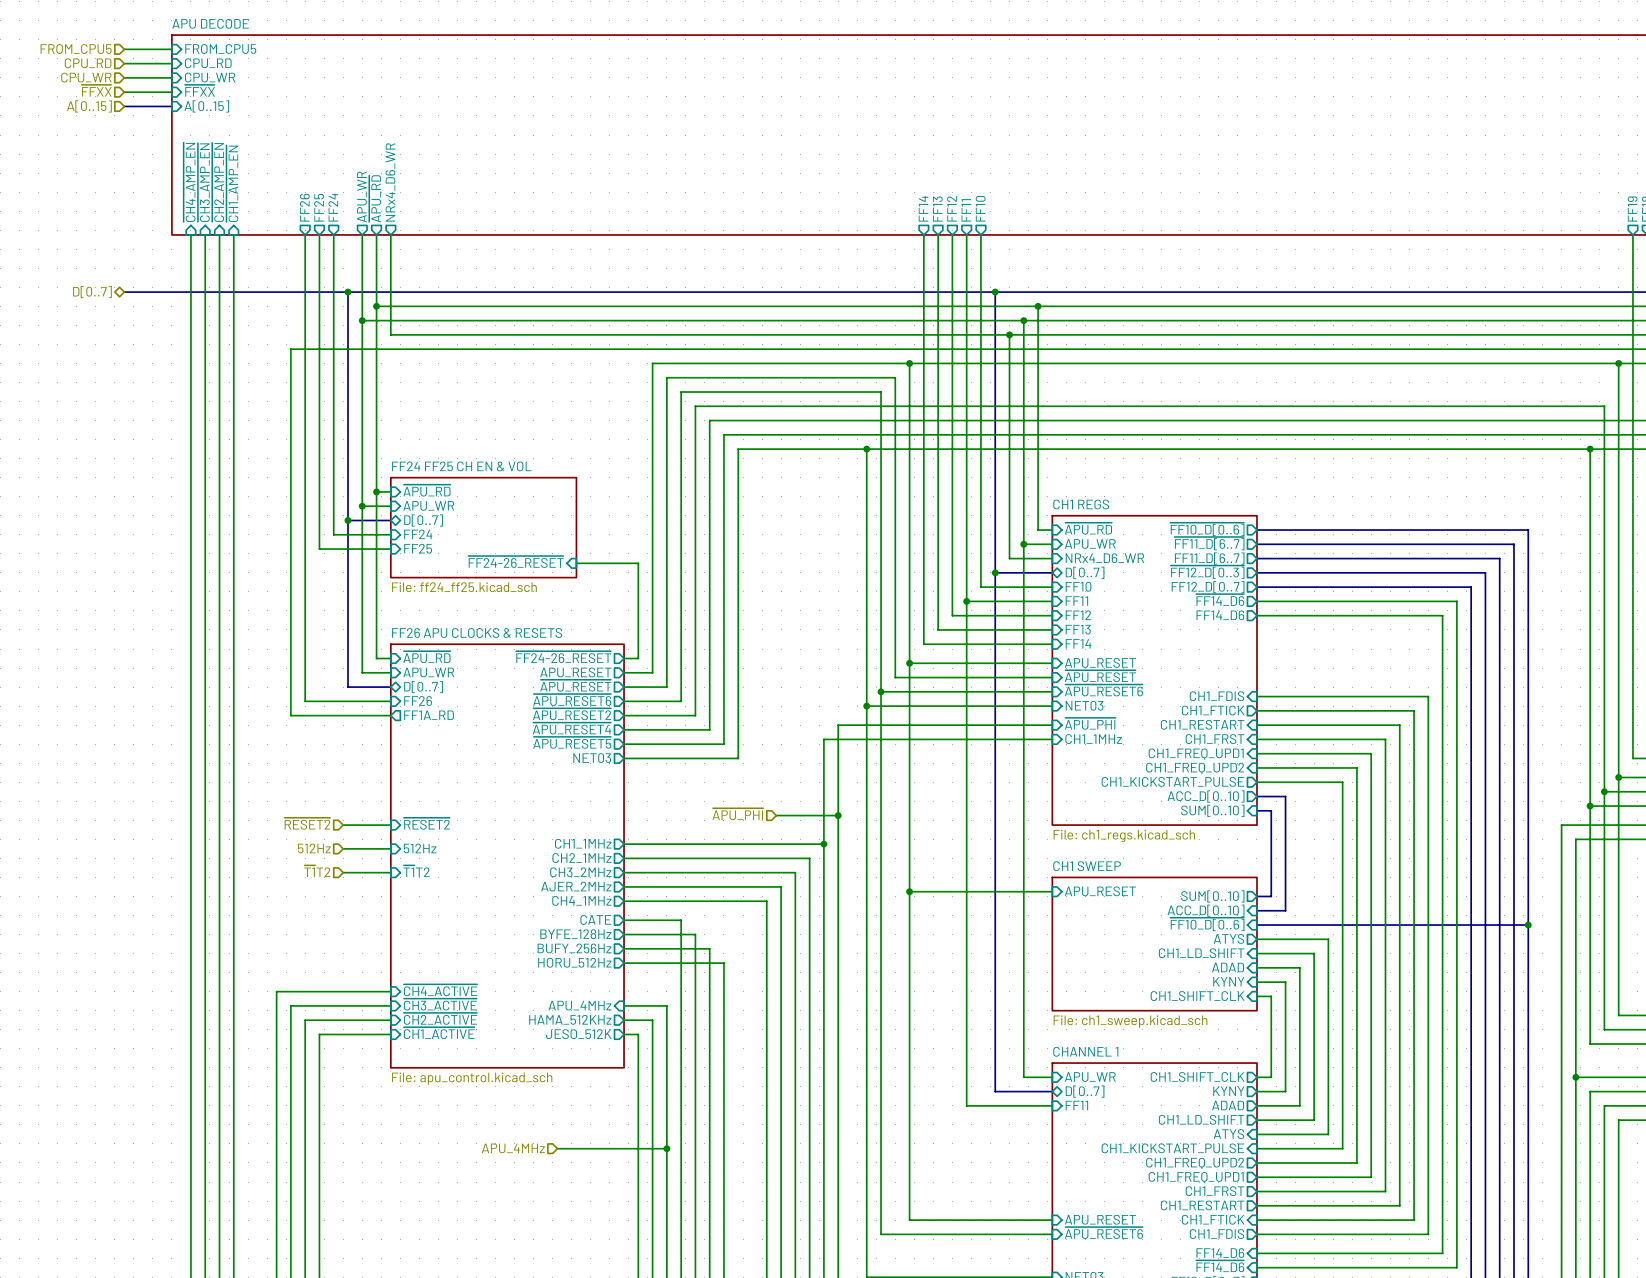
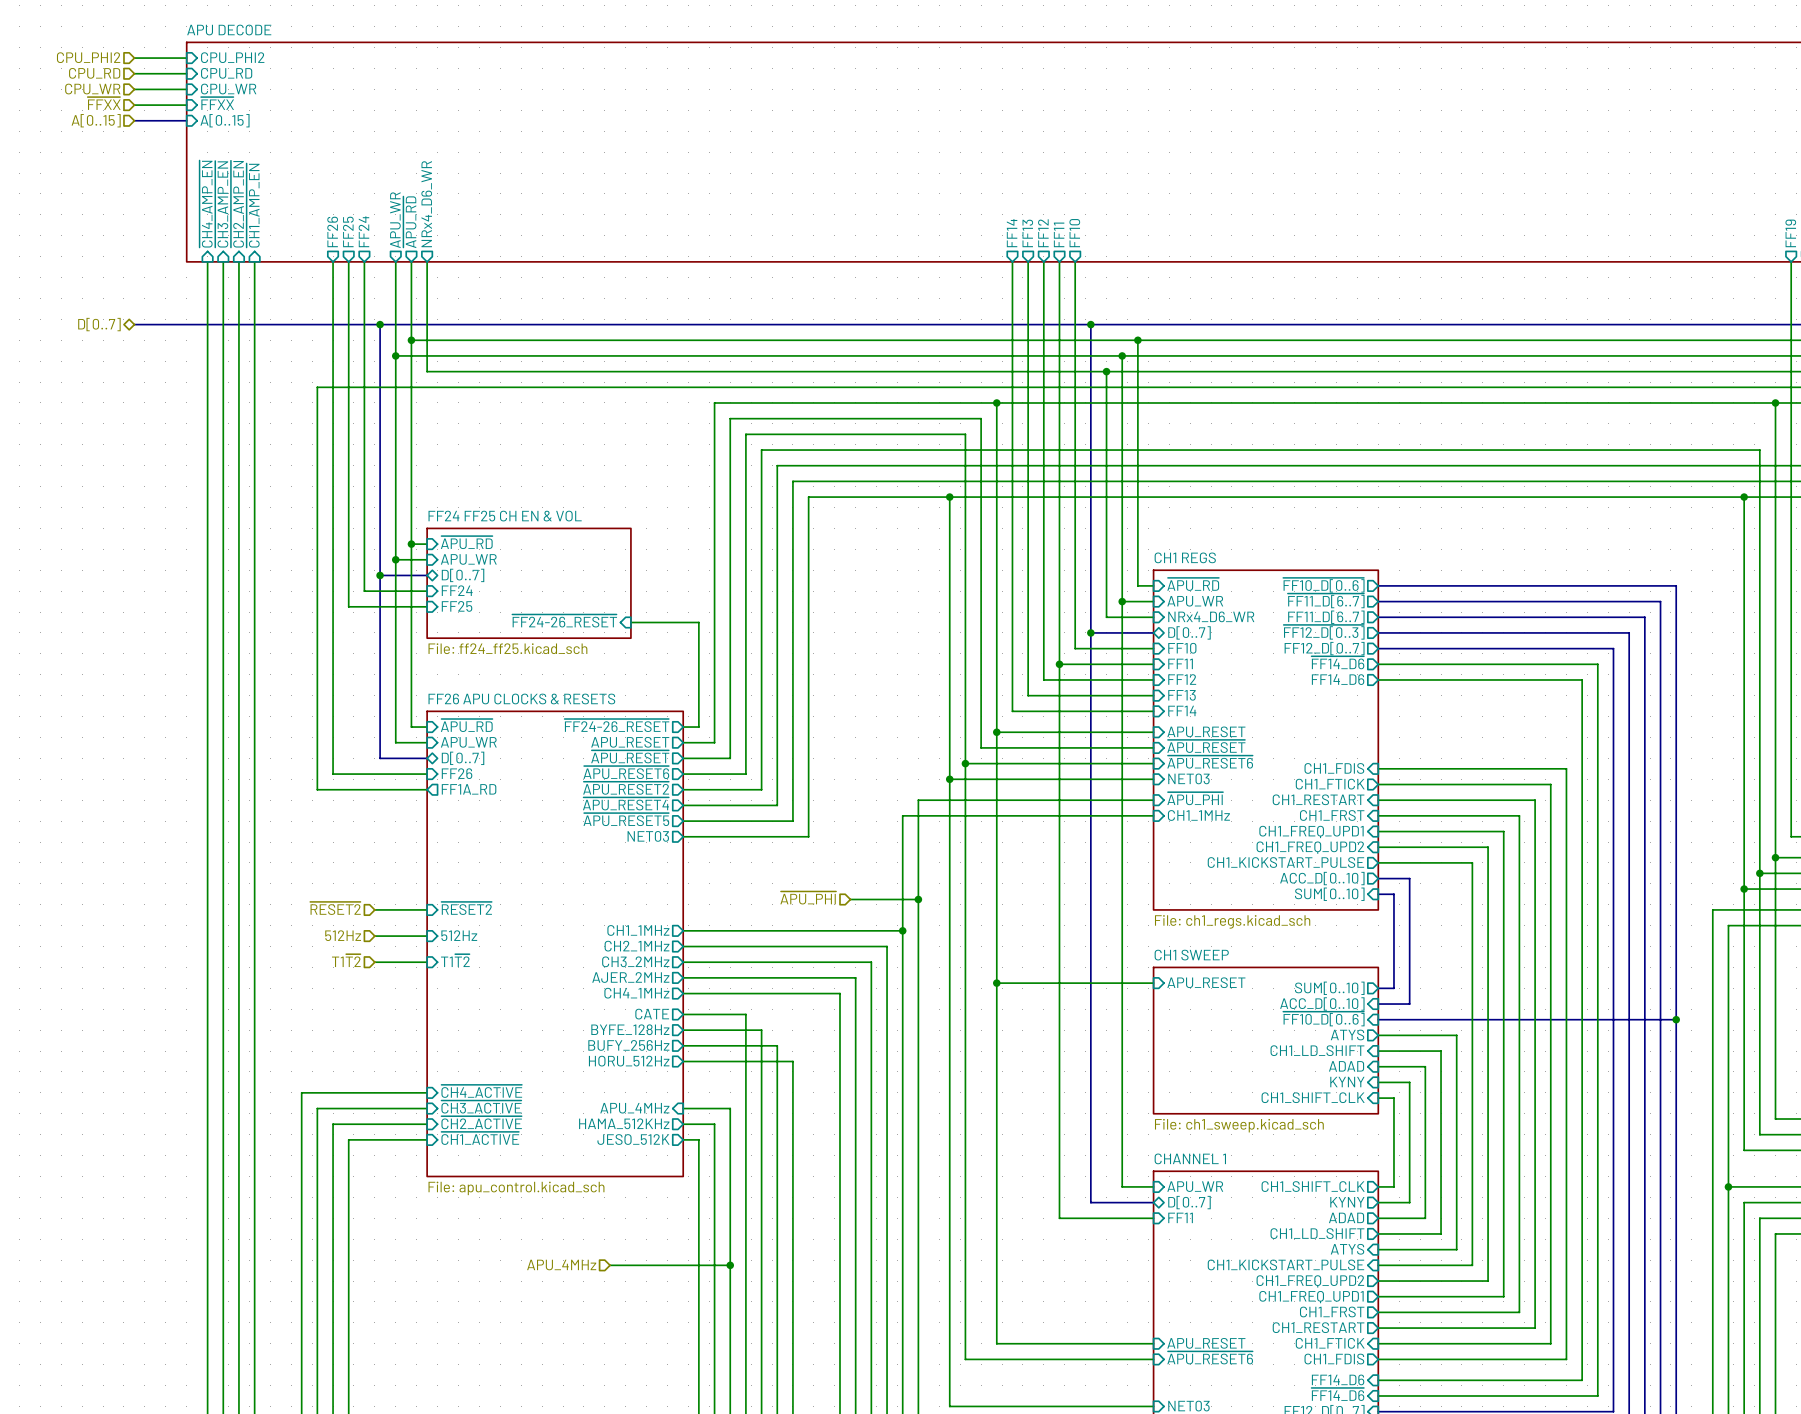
hierarchical label: FROM_CPU5 (76, 49) -> CPU_PHI2 (88, 57)
sheet pin: FROM_CPU5 (220, 49) -> CPU_PHI2 (232, 57)
hierarchical label: ~{T1}T2 (317, 871) -> T1~{T2} (346, 960)
sheet pin: ~{T1}T2 (416, 871) -> T1~{T2} (455, 960)

